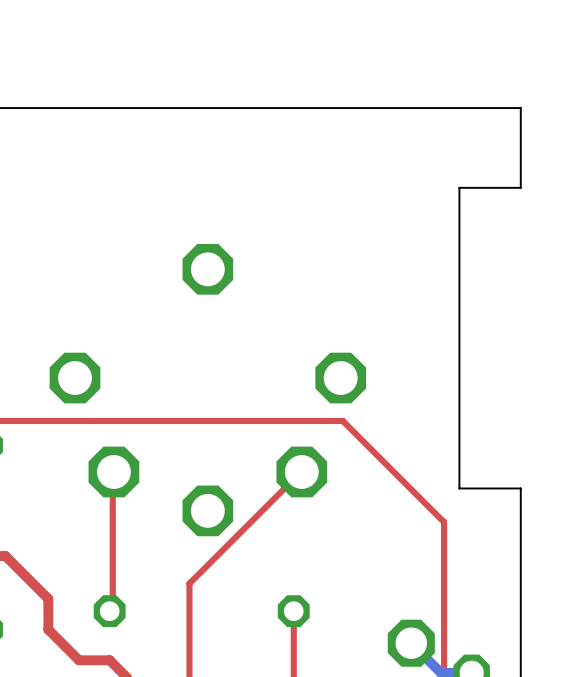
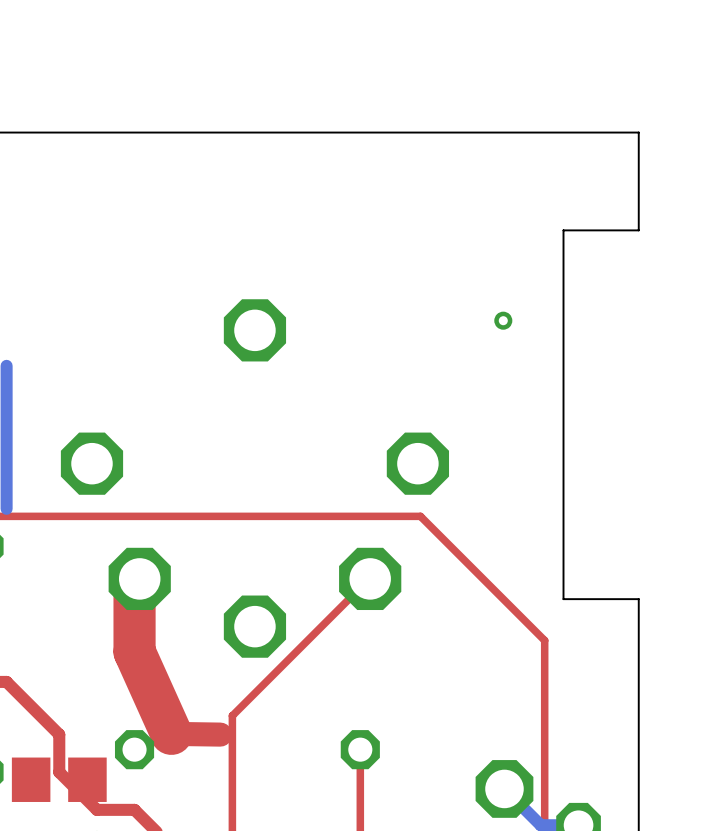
via: none -> (503, 320)
bottom track: none -> (6, 365) (6, 508)
top track: (112, 473) (112, 608) (109, 611) -> (138, 580) (134, 584) (134, 651) (171, 733) (220, 734)
part: none -> (59, 779)

